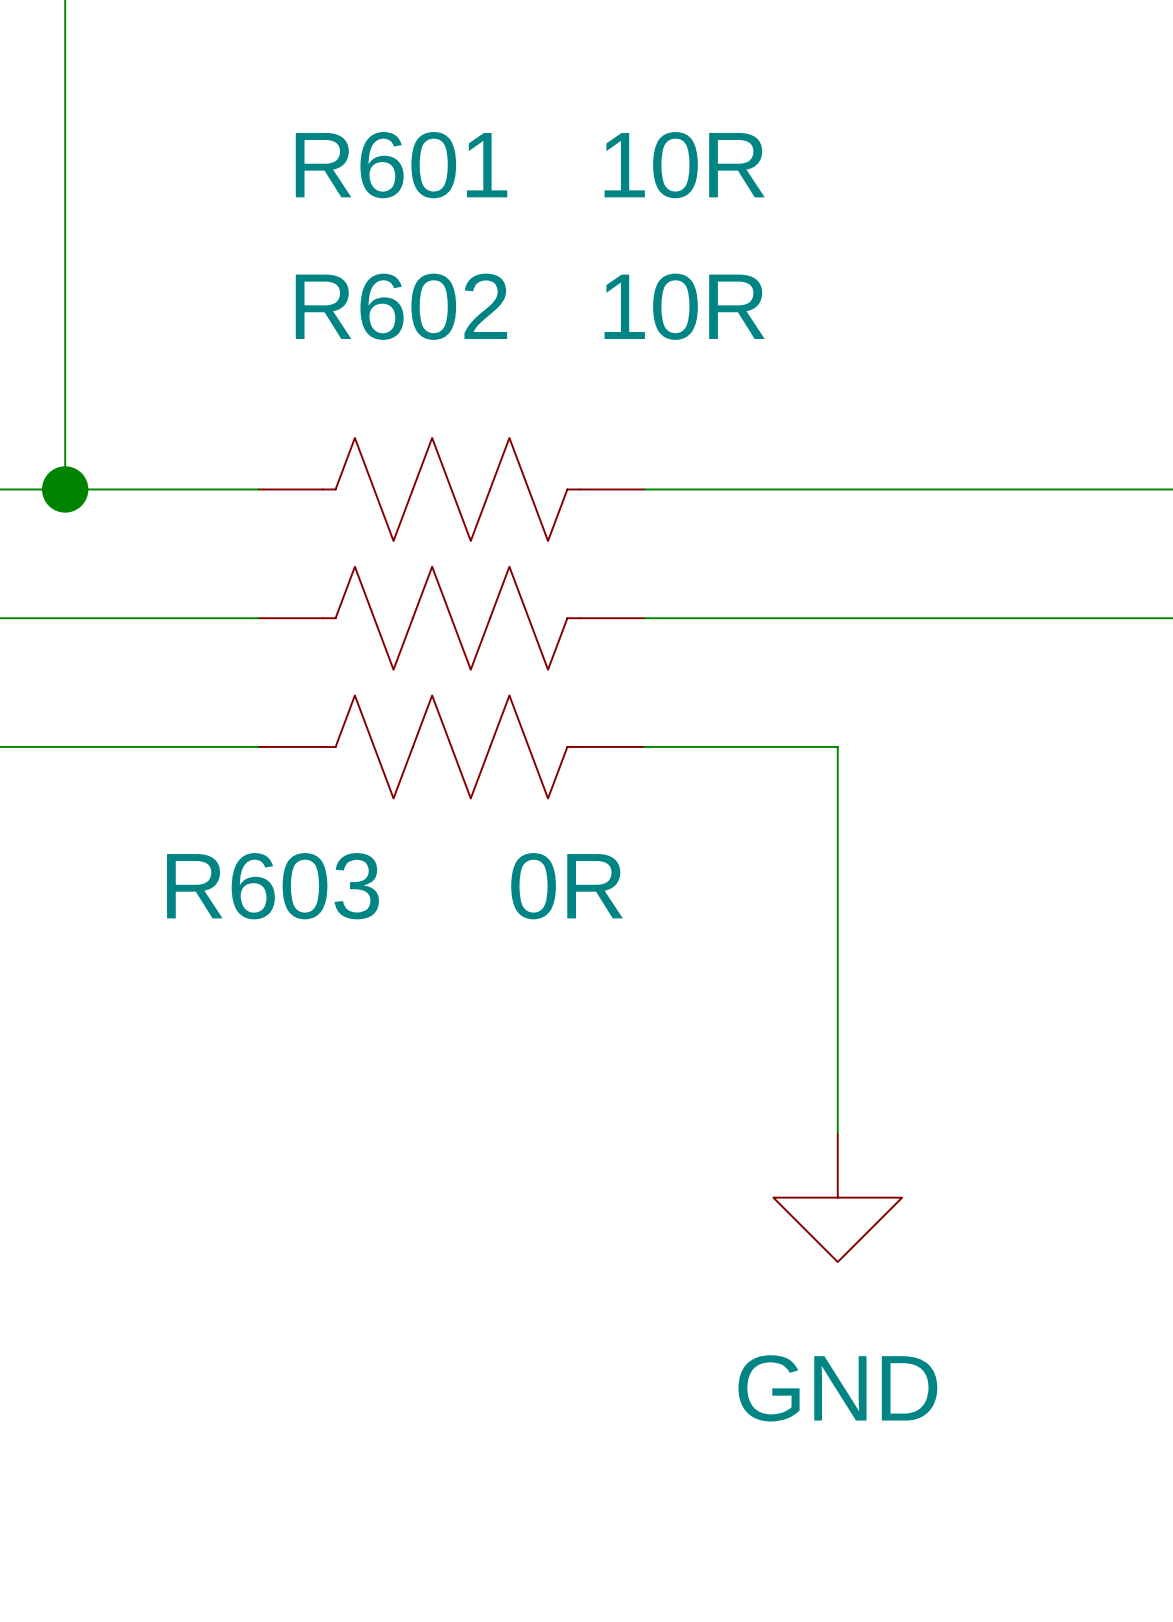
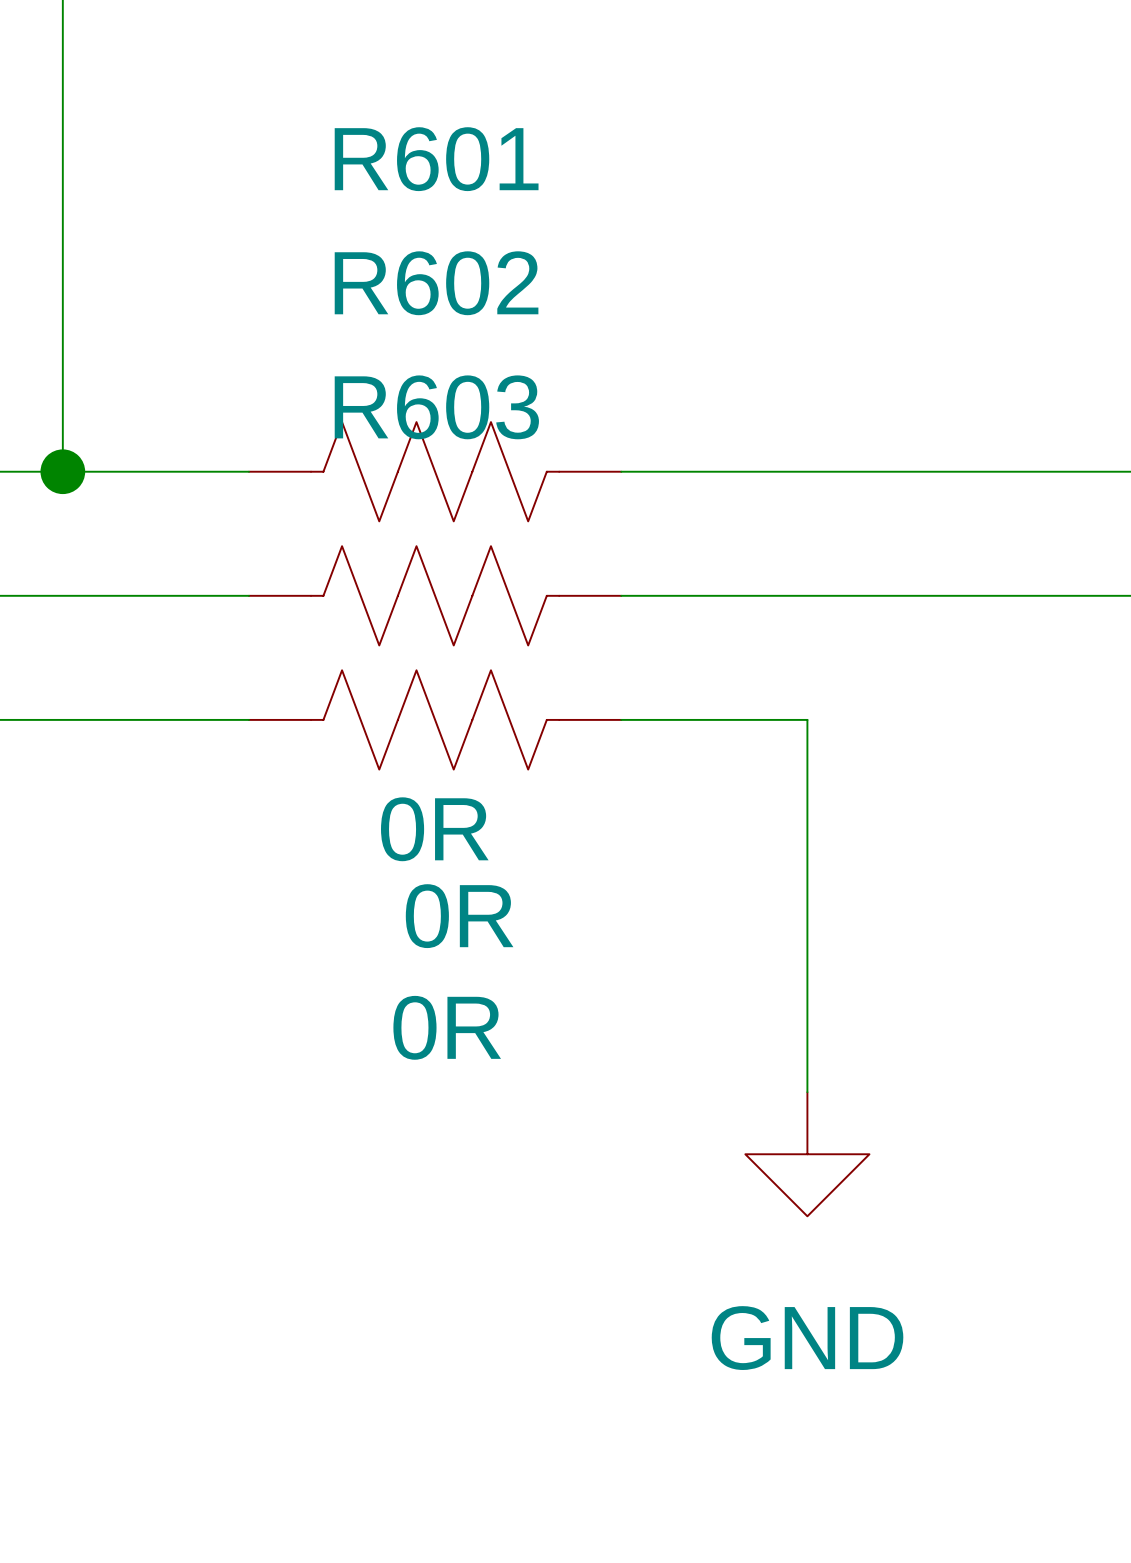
R601 name position: R601 (401, 165) -> R601 (436, 159)
R601 value: 10R (684, 165) -> 0R (434, 829)
R602 name position: R602 (401, 306) -> R602 (436, 283)
R602 value: 10R (684, 306) -> 0R (447, 1027)
R603 name position: R603 (272, 886) -> R603 (436, 407)
R603 value position: 0R (567, 886) -> 0R (459, 916)

